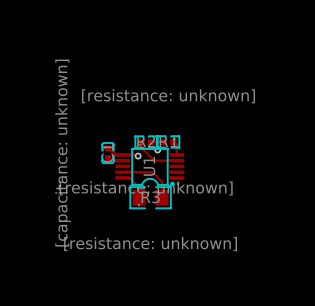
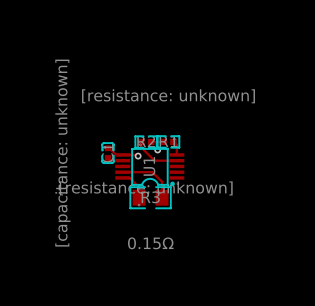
R3 value: [resistance: unknown] (150, 244) -> 0.15Ω (150, 243)

